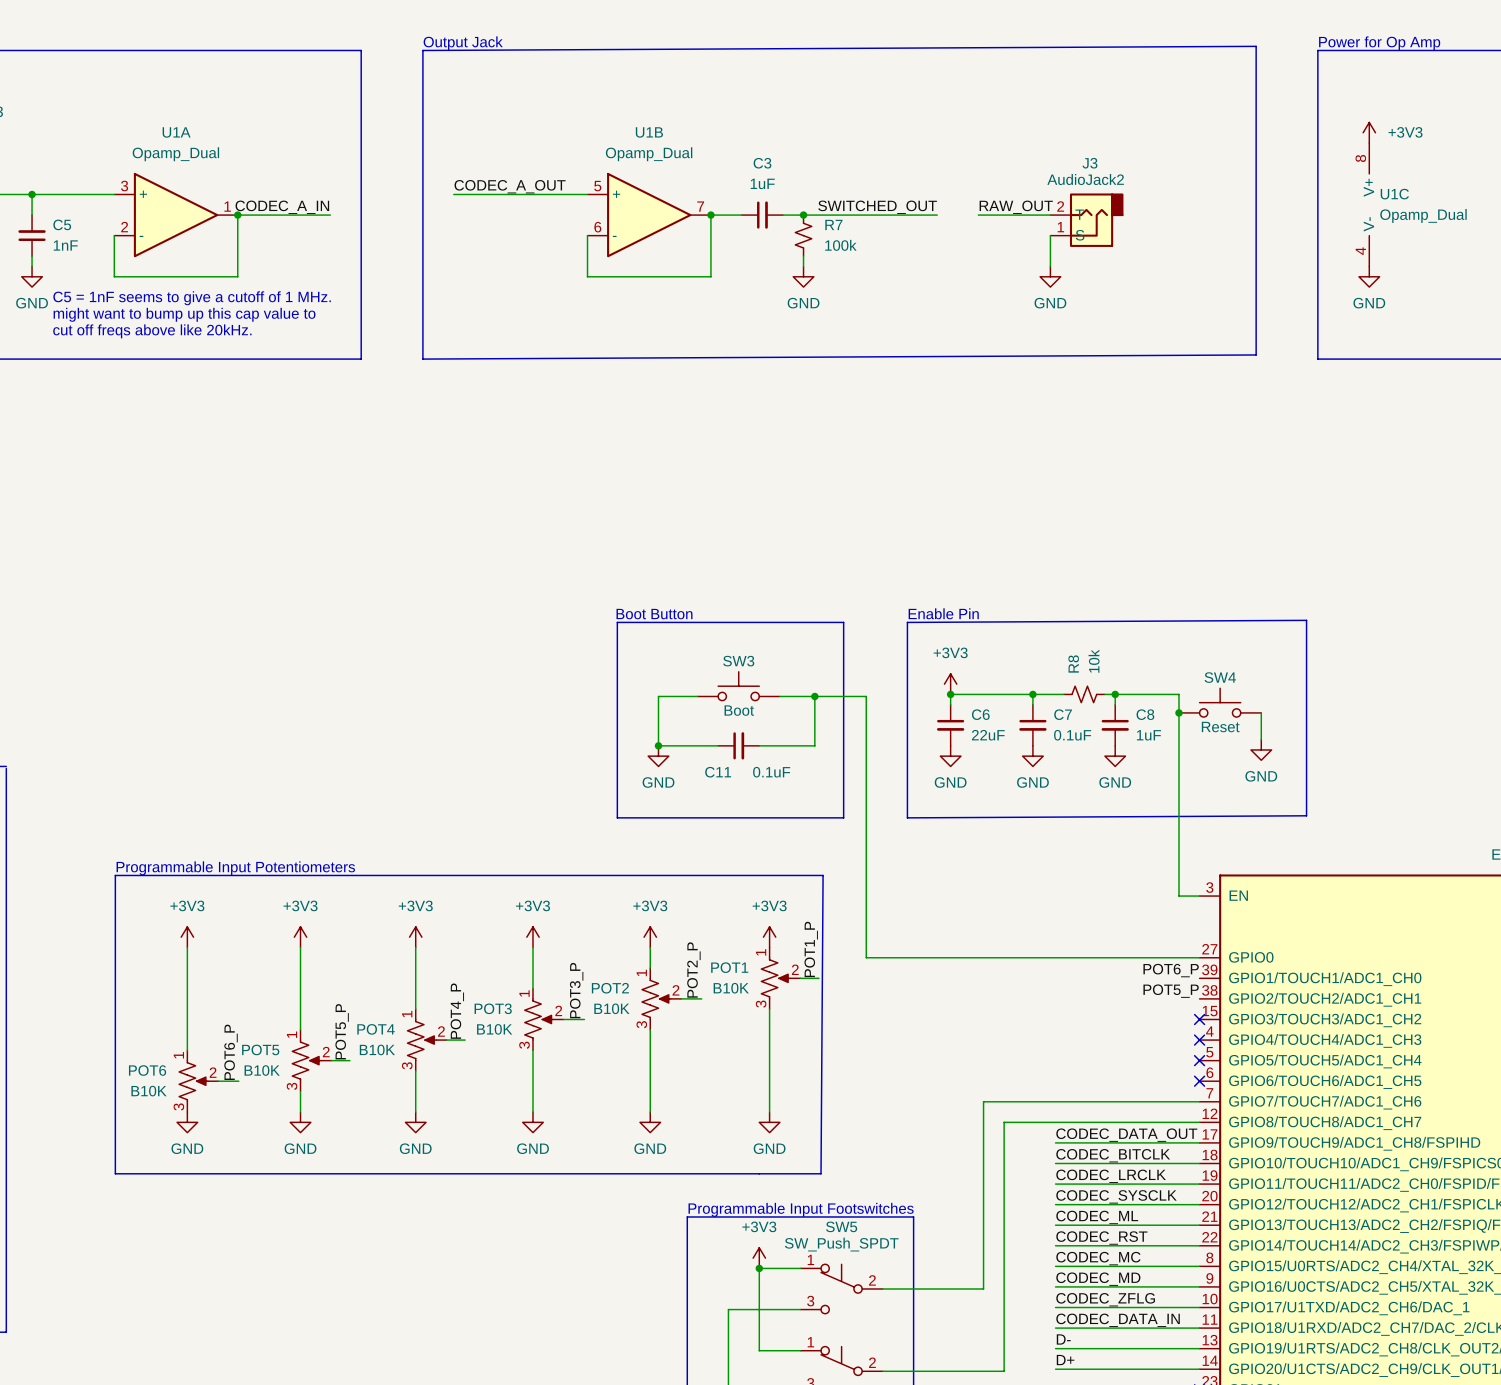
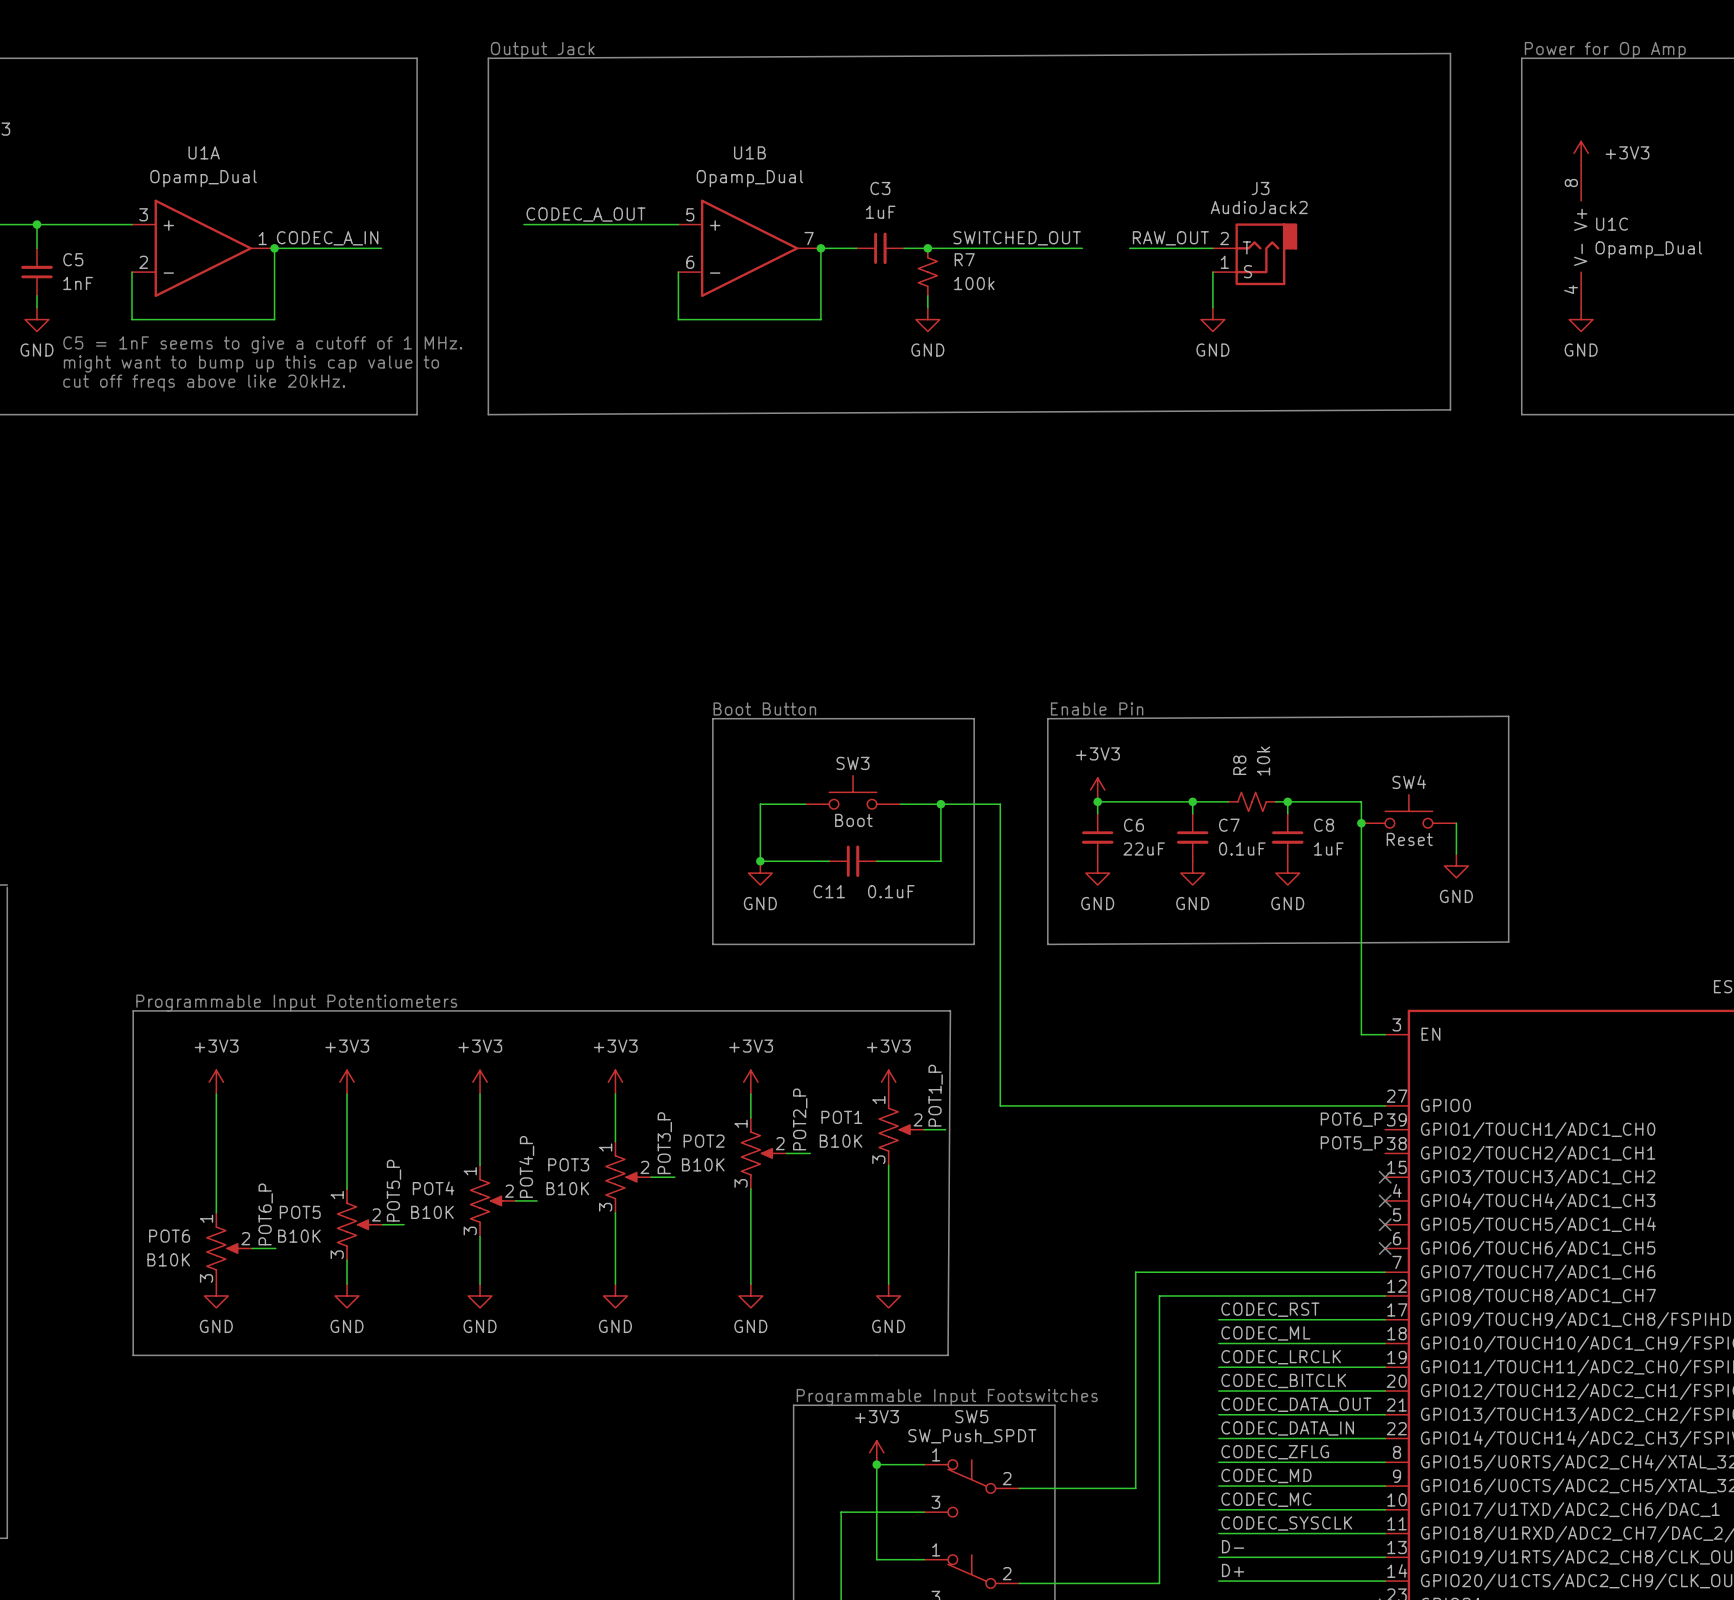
label: CODEC_DATA_OUT (1126, 1135) -> CODEC_RST (1270, 1309)
label: CODEC_BITCLK (1113, 1155) -> CODEC_ML (1265, 1333)
label: CODEC_SYSCLK (1116, 1196) -> CODEC_BITCLK (1283, 1380)
label: CODEC_ML (1097, 1217) -> CODEC_DATA_OUT (1296, 1404)
label: CODEC_RST (1101, 1238) -> CODEC_DATA_IN (1287, 1428)
label: CODEC_MC (1098, 1258) -> CODEC_ZFLG (1275, 1452)
label: CODEC_ZFLG (1105, 1299) -> CODEC_MC (1266, 1499)
label: CODEC_DATA_IN (1118, 1320) -> CODEC_SYSCLK (1286, 1523)

